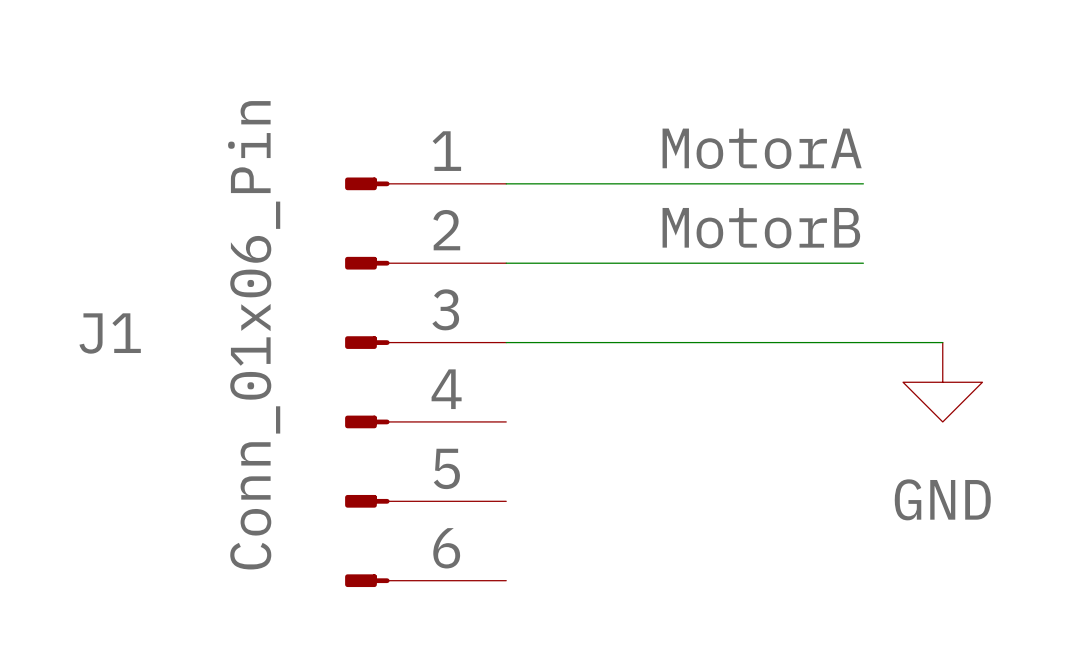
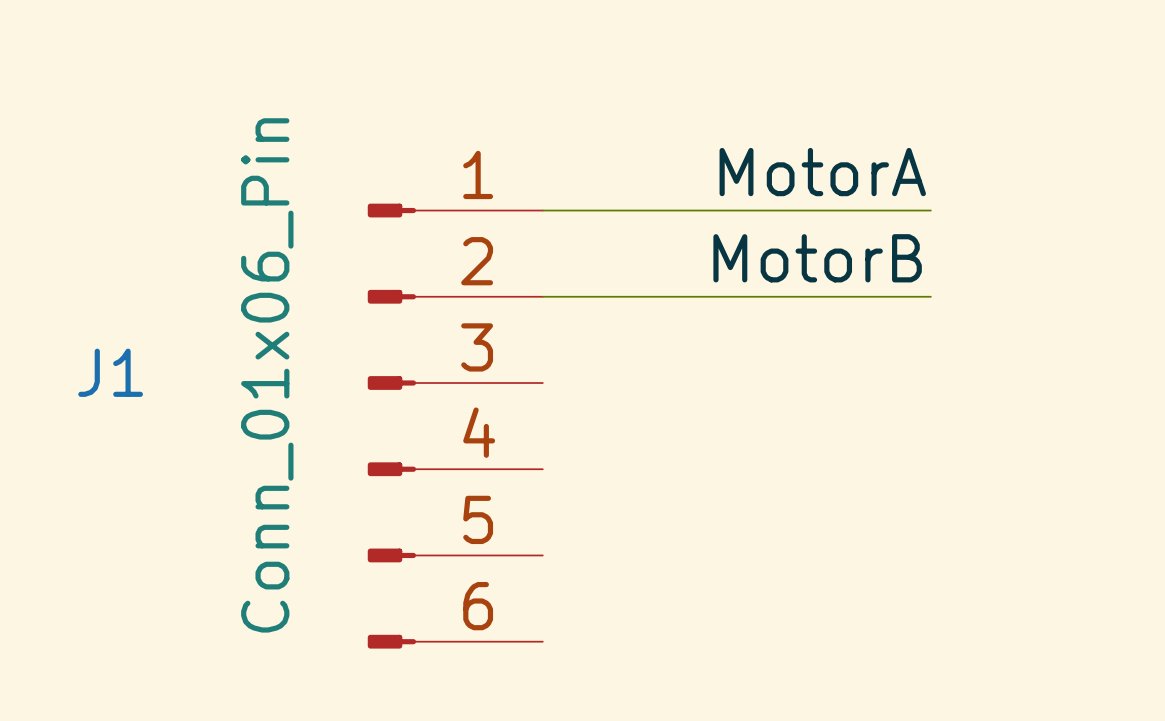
wire: (506, 342) (942, 342) -> none
power symbol: GND (942, 382) -> none

